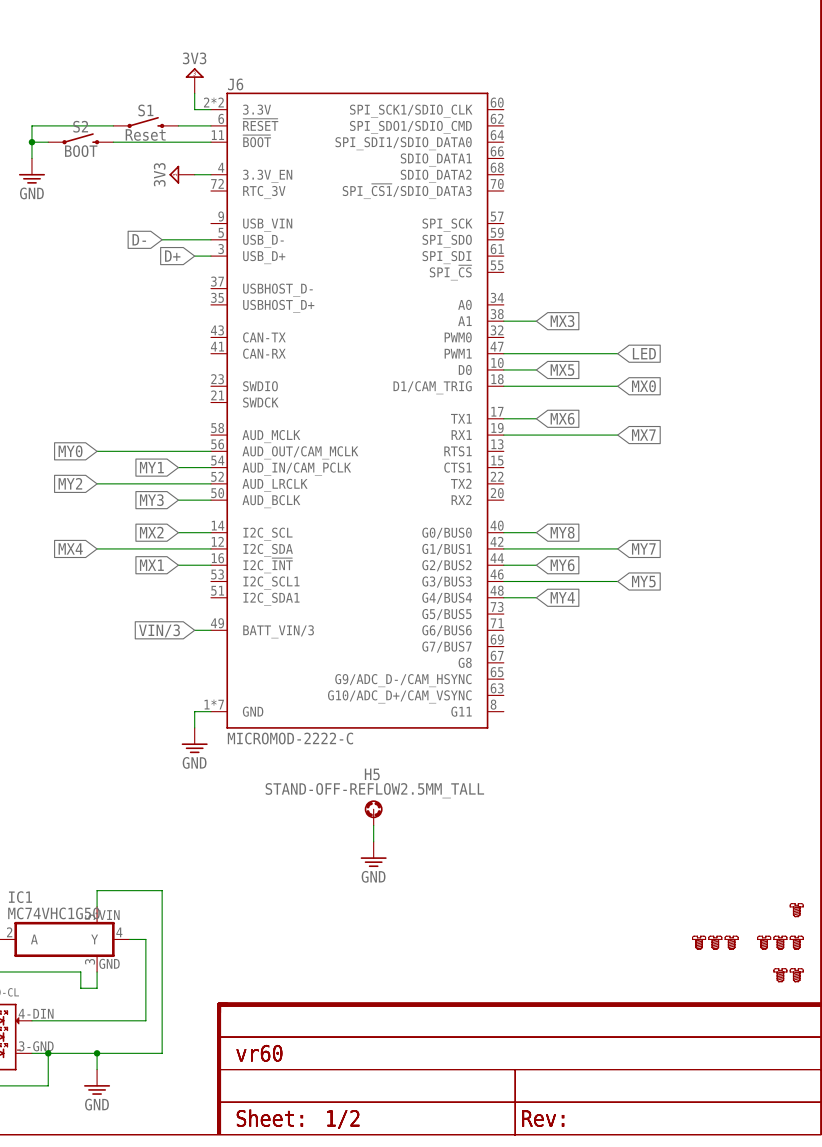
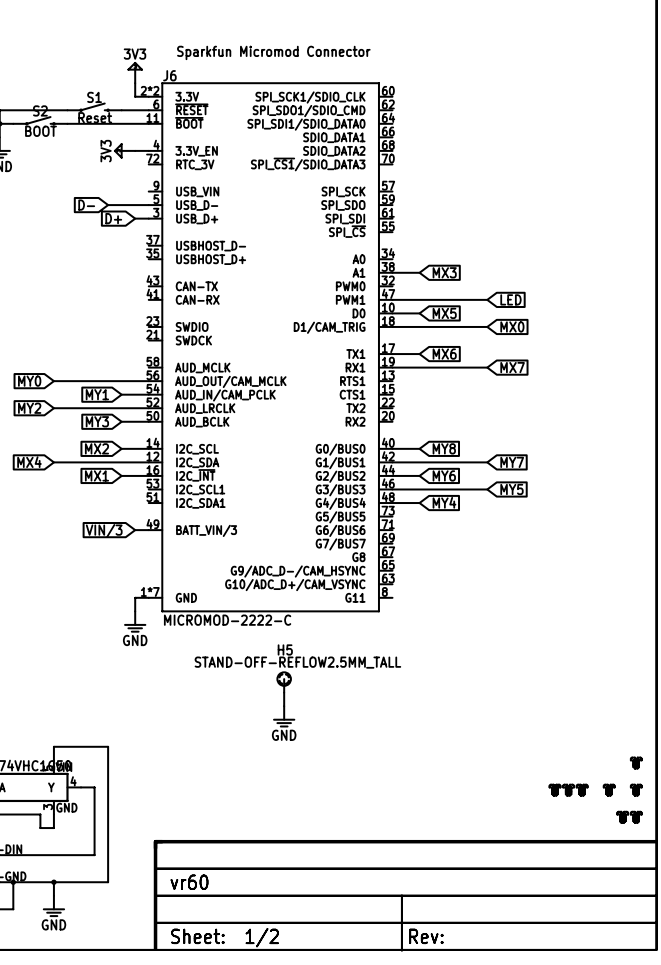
text: none -> Sparkfun Micromod Connector (273, 52)
part: (780, 942) -> none

